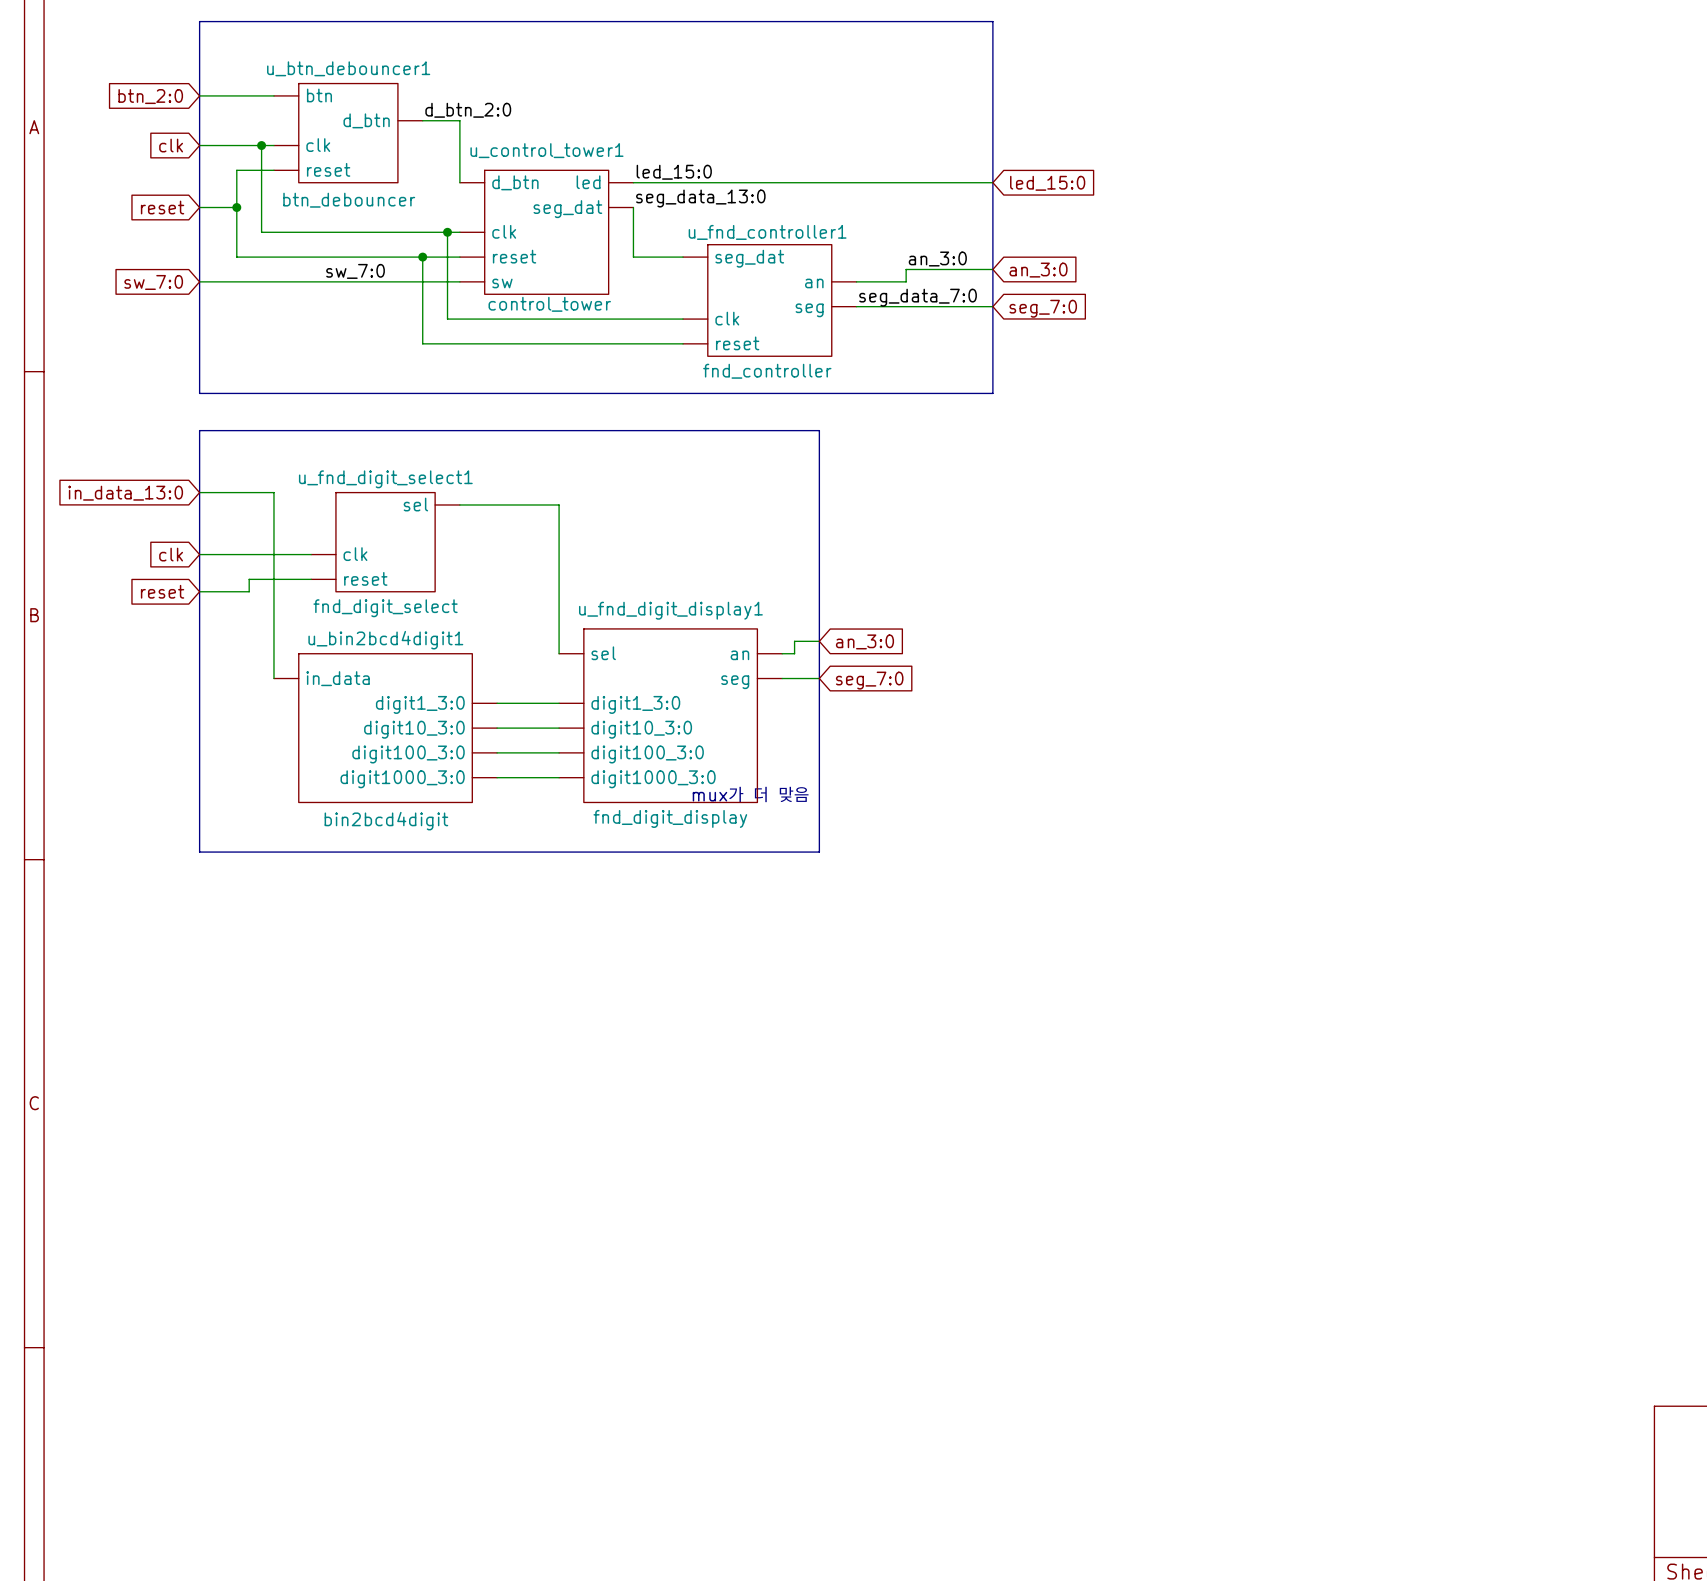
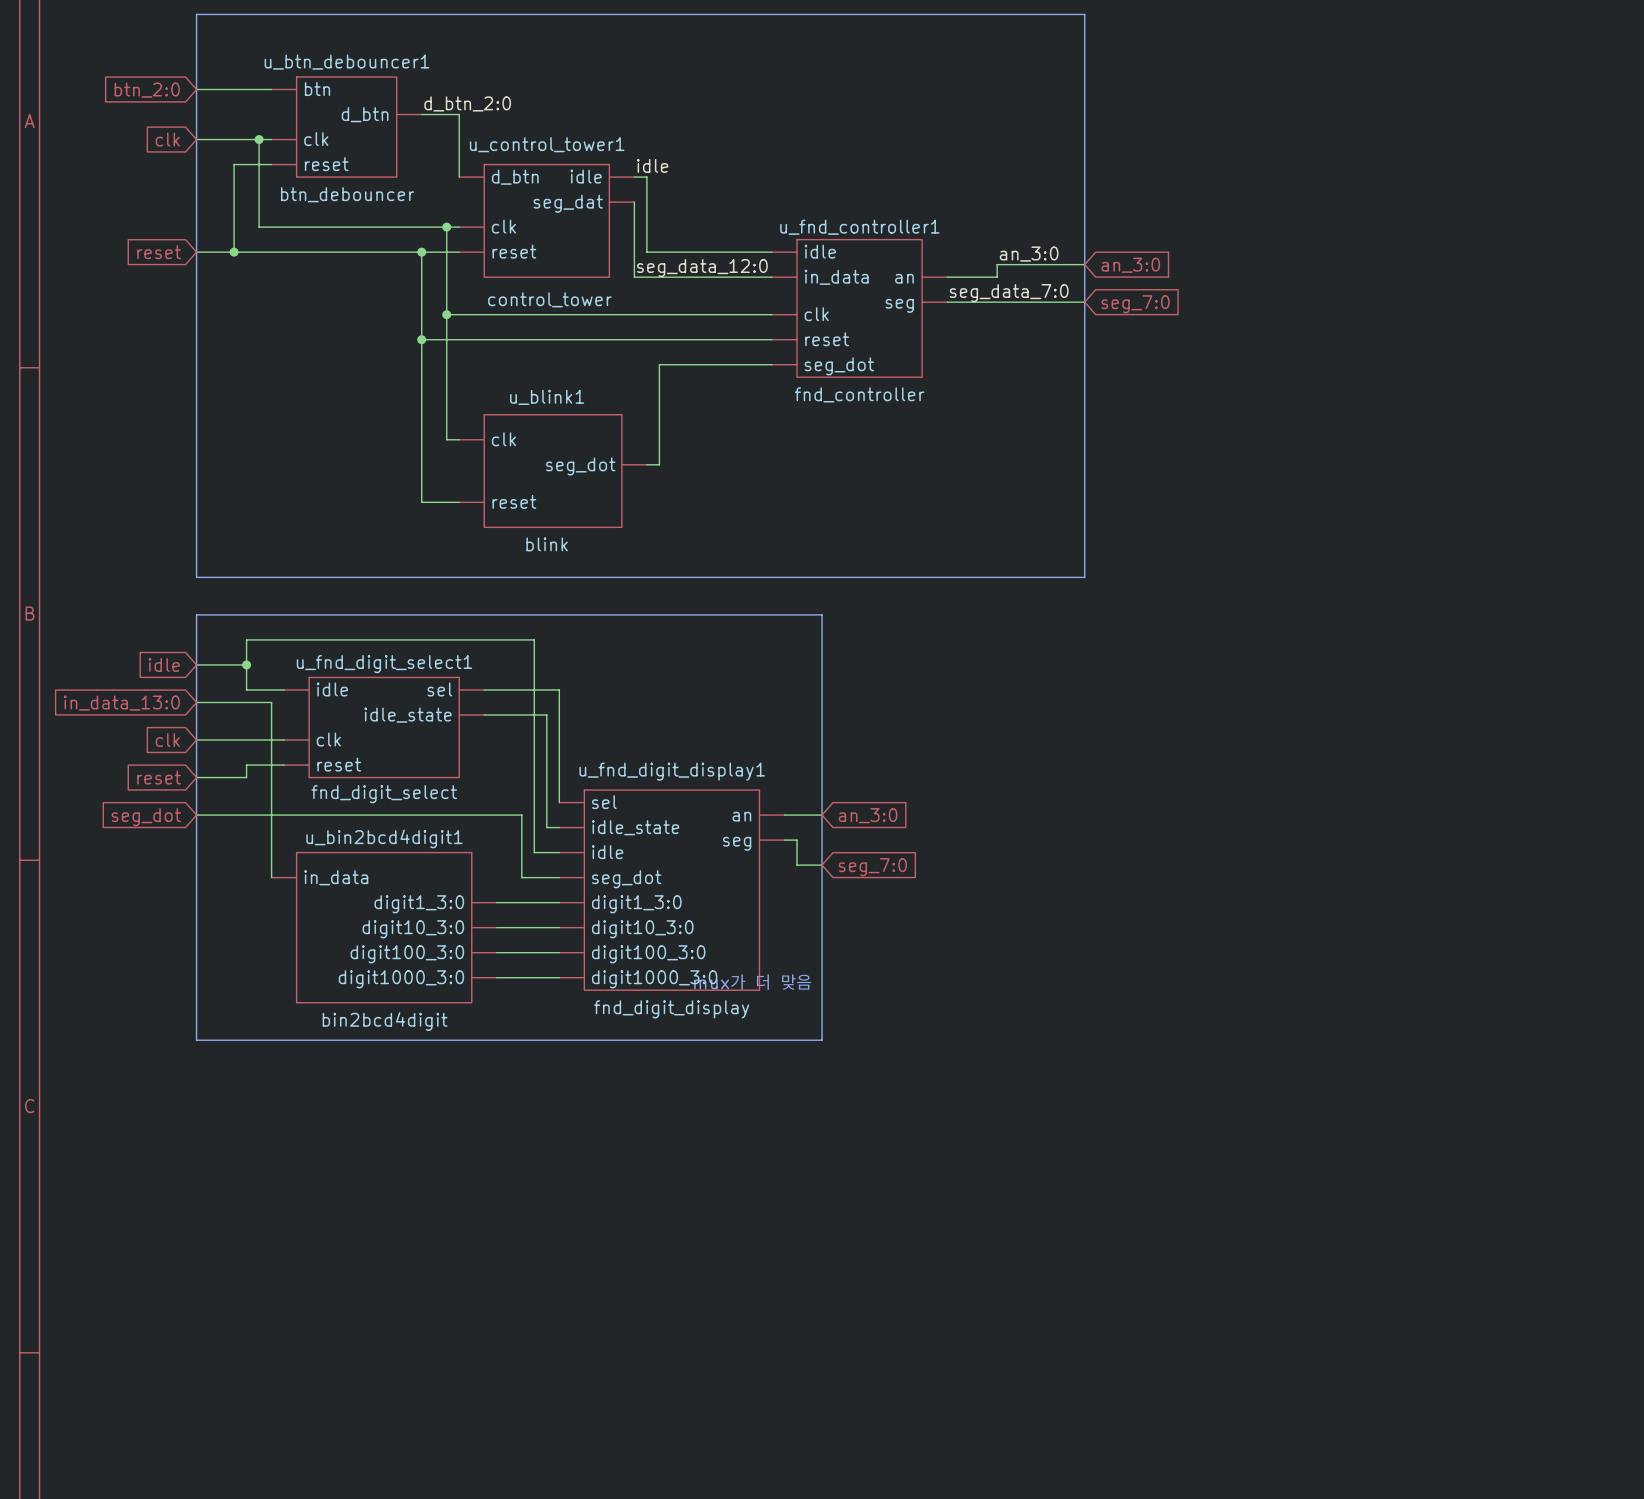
line: (992, 21) (992, 393) (199, 393) -> (997, 14) (1084, 14) (1084, 577) (196, 577)
u_control_tower1 symbol: [459, 170, 634, 295] -> [459, 164, 635, 278]
label: led_15:0 (674, 172) -> idle (652, 165)
wire: (645, 182) (992, 182) -> none
global label: led_15:0 (1047, 183) -> none
label: seg_data_13:0 (700, 198) -> none
global label position: reset (162, 207) -> reset (159, 252)
wire: (199, 207) (236, 207) -> (196, 252) (234, 252)
junction position: (236, 207) -> (234, 252)
u_fnd_controller1 symbol: [683, 244, 857, 357] -> [772, 239, 948, 378]
wire: (633, 257) (645, 257) -> (646, 177) (646, 252)
wire: none -> (634, 252) (634, 277) (772, 277)
wire: none -> (684, 252) (772, 252)
label position: an_3:0 (937, 259) -> an_3:0 (1029, 254)
wire: (992, 269) (906, 269) (906, 281) (856, 281) -> (1084, 264) (997, 264) (997, 277) (947, 277)
global label position: an_3:0 (1038, 270) -> an_3:0 (1130, 265)
label: sw_7:0 (355, 271) -> none
label: none -> seg_data_12:0 (702, 268)
wire: (199, 281) (459, 281) -> none
global label: sw_7:0 (153, 282) -> none
label position: seg_data_7:0 (918, 297) -> seg_data_7:0 (1009, 293)
wire: (856, 306) (943, 306) -> (997, 302) (1084, 302)
global label position: seg_7:0 (1043, 308) -> seg_7:0 (1135, 304)
wire: none -> (446, 314) (446, 439) (459, 439)
junction: none -> (446, 314)
wire: none -> (684, 314) (772, 314)
junction: none -> (421, 339)
wire: none -> (684, 339) (772, 339)
wire: none -> (772, 364) (659, 364) (659, 464) (646, 464)
line: (199, 430) (819, 430) (819, 616) -> (196, 614) (822, 614)
u_blink1: none -> blink (553, 471)
wire: (199, 492) (273, 492) (273, 678) -> none
u_fnd_digit_select1 symbol: [311, 492, 460, 592] -> [284, 677, 485, 778]
global label position: in_data_13:0 (125, 493) -> in_data_13:0 (121, 703)
wire: (459, 504) (559, 504) (559, 653) -> (459, 502) (421, 502) (421, 339)
global label position: clk (171, 554) -> clk (167, 740)
wire: (199, 554) (311, 554) -> none
line: (199, 579) (199, 616) -> (196, 389) (196, 427)
wire: (311, 579) (249, 579) (249, 591) (199, 591) -> none
global label: reset (162, 591) -> none
u_fnd_digit_display1 symbol: [559, 628, 783, 803] -> [559, 790, 785, 991]
wire: (819, 641) (794, 641) (794, 653) (782, 653) -> none
global label position: an_3:0 (864, 641) -> an_3:0 (868, 815)
global label: none -> idle (164, 664)
wire: none -> (196, 664) (246, 664)
junction: none -> (246, 664)
wire: (782, 678) (819, 678) -> (784, 815) (822, 815)
global label position: seg_7:0 (869, 680) -> seg_7:0 (872, 867)
wire: none -> (284, 689) (246, 689) (246, 639) (534, 639) (534, 852) (559, 852)
wire: none -> (484, 689) (559, 689) (559, 802)
wire: none -> (196, 702) (271, 702) (271, 877)
wire: (497, 703) (559, 703) -> (496, 902) (559, 902)
wire: none -> (484, 714) (546, 714) (546, 827) (559, 827)
u_bin2bcd4digit1 position: (385, 728) -> (384, 927)
wire: (497, 728) (559, 728) -> (496, 927) (559, 927)
wire: none -> (196, 740) (284, 740)
wire: (497, 752) (559, 752) -> (496, 952) (559, 952)
wire: none -> (284, 765) (246, 765) (246, 777) (196, 777)
global label: none -> reset (159, 777)
wire: (497, 777) (559, 777) -> (496, 977) (559, 977)
text position: mux가 더 맞음 (750, 794) -> mux가 더 맞음 (753, 982)
wire: none -> (196, 815) (521, 815) (521, 877) (559, 877)
global label: none -> seg_dot (146, 817)
wire: none -> (784, 840) (797, 840) (797, 865) (822, 865)
line: (199, 852) (819, 852) -> (196, 852) (196, 1040) (822, 1040) (822, 852)

